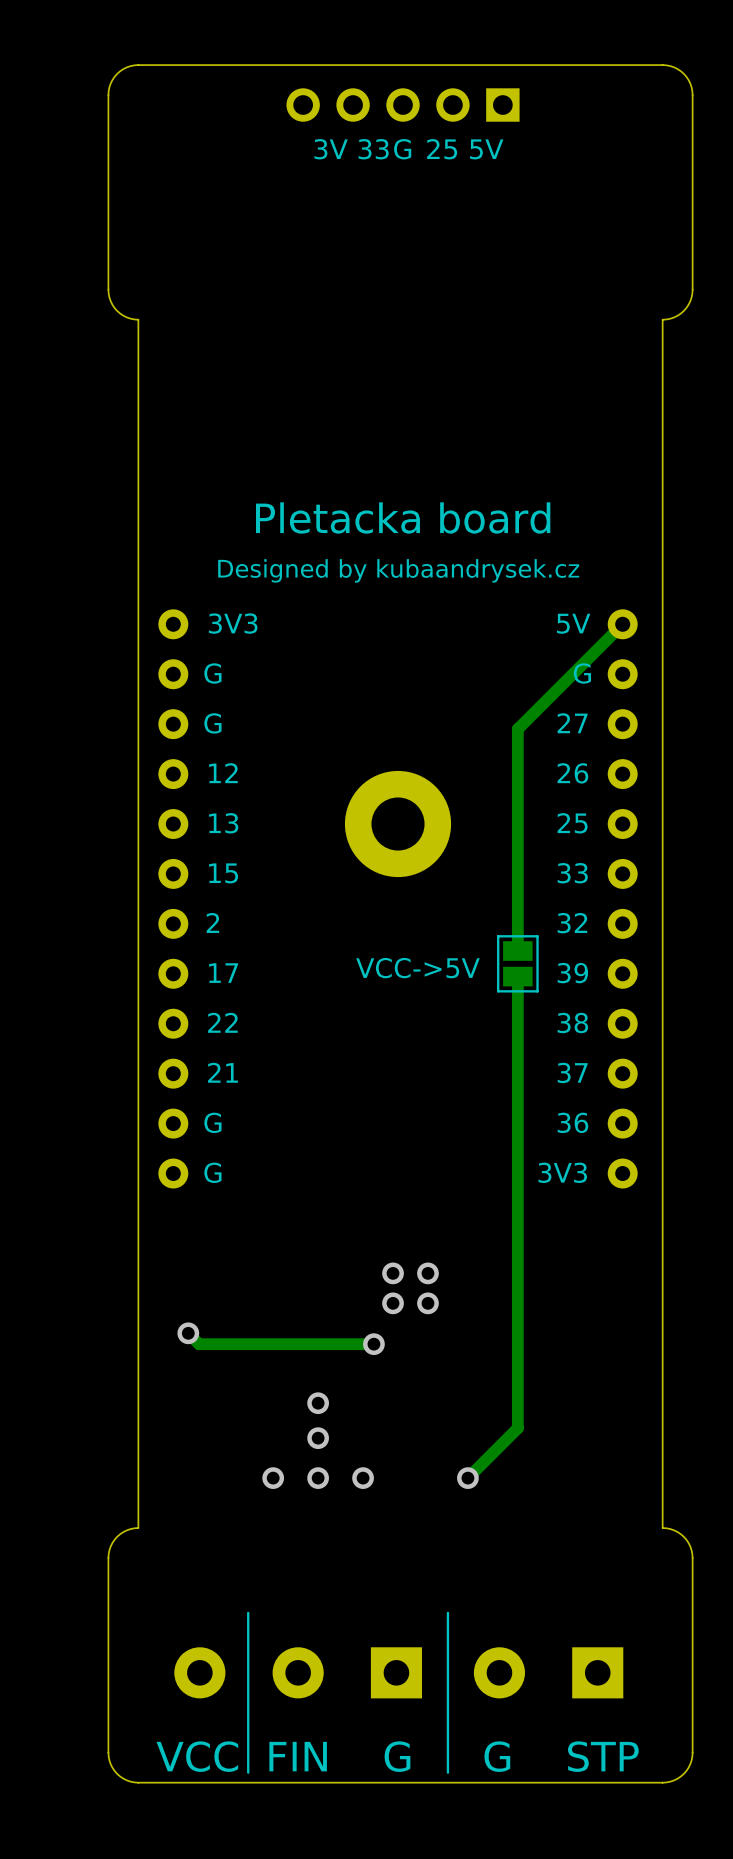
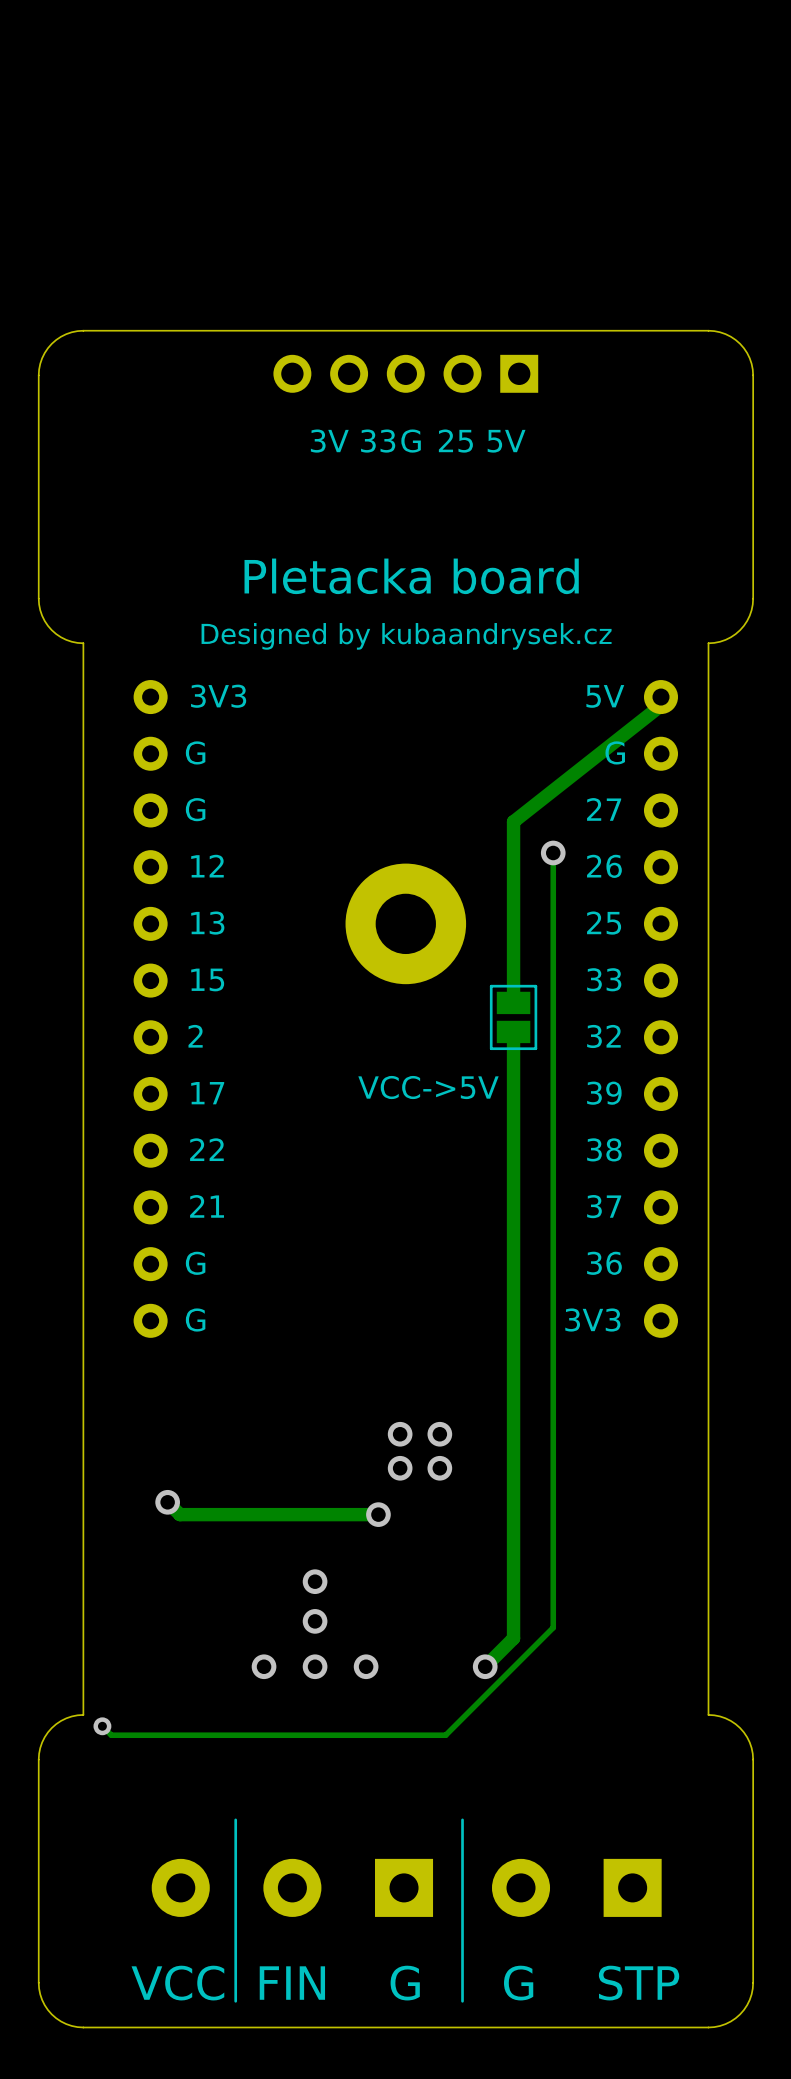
board edge: (662, 65) (138, 65) (126, 67) (120, 71) (112, 80) (109, 87) (108, 293) (112, 304) (120, 313) (126, 317) (138, 319) (138, 1528) (126, 1530) (117, 1536) (110, 1546) (108, 1557) (108, 1756) (110, 1764) (117, 1773) (130, 1781) (662, 1782) (674, 1780) (680, 1776) (686, 1770) (691, 1760) (692, 1554) (688, 1543) (680, 1534) (674, 1530) (662, 1528) (662, 319) (674, 317) (680, 313) (688, 304) (692, 293) (692, 95) (690, 83) (683, 73) (674, 67) (662, 65) -> (708, 330) (725, 334) (740, 343) (749, 358) (753, 375) (752, 604) (749, 615) (740, 630) (725, 639) (708, 643) (708, 1714) (725, 1718) (740, 1728) (749, 1742) (752, 1753) (753, 1982) (749, 1999) (743, 2010) (735, 2018) (725, 2024) (708, 2027) (83, 2027) (66, 2024) (56, 2018) (47, 2010) (42, 1999) (39, 1988) (38, 1759) (42, 1742) (51, 1728) (66, 1718) (83, 1714) (83, 643) (66, 639) (51, 630) (42, 615) (39, 604) (38, 375) (42, 358) (51, 343) (61, 336) (71, 332) (83, 330) (708, 330)
part position: (403, 105) -> (405, 373)
text position: G (402, 149) -> G (411, 441)
text position: 3V 33 25 5V (408, 149) -> 3V 33 25 5V (418, 441)
track: (622, 624) (517, 729) (517, 951) -> none
track: none -> (660, 705) (513, 821) (513, 1003)
track: none -> (553, 852) (553, 1627) (445, 1735) (111, 1735) (102, 1726)
via: none -> (553, 852)
part position: (517, 963) -> (513, 1017)
track: (517, 976) (517, 1428) (492, 1453) -> (513, 1031) (513, 1638)
via: none -> (102, 1726)

